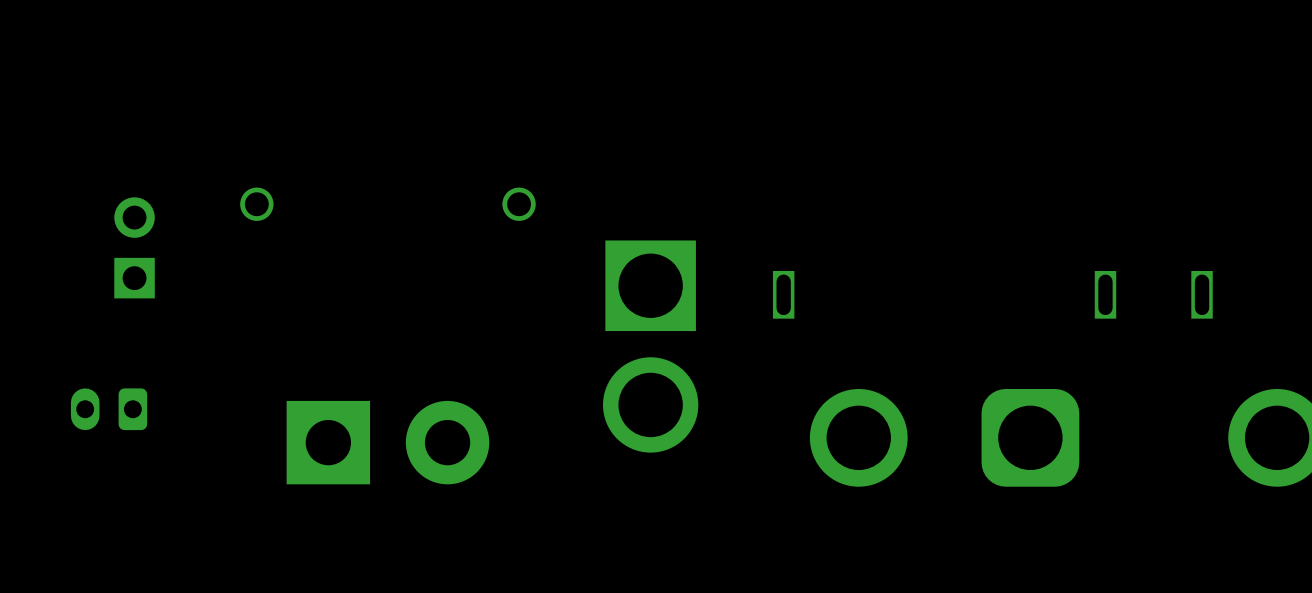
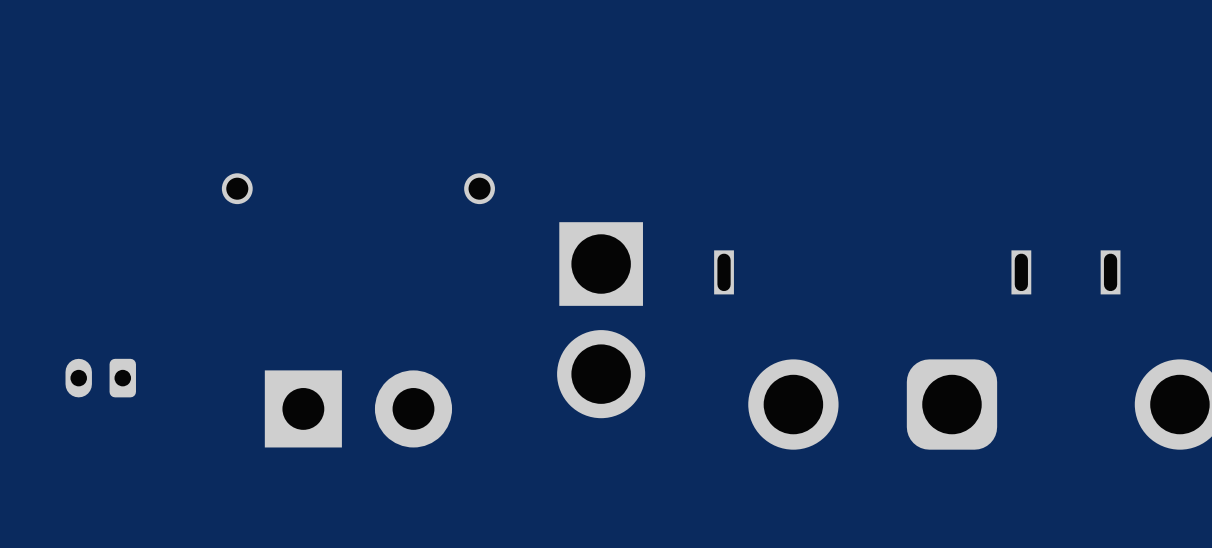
part: (134, 247) -> none

